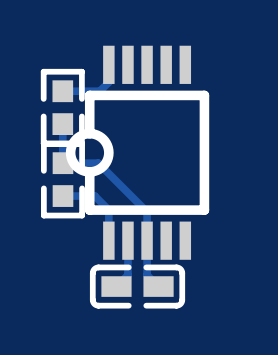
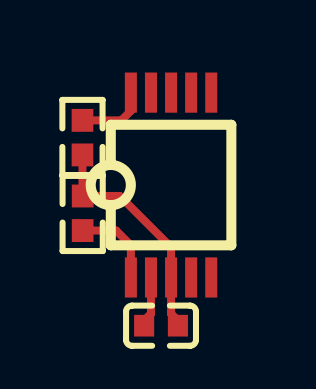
part footprint: [89, 264, 186, 309] -> [123, 302, 199, 349]

